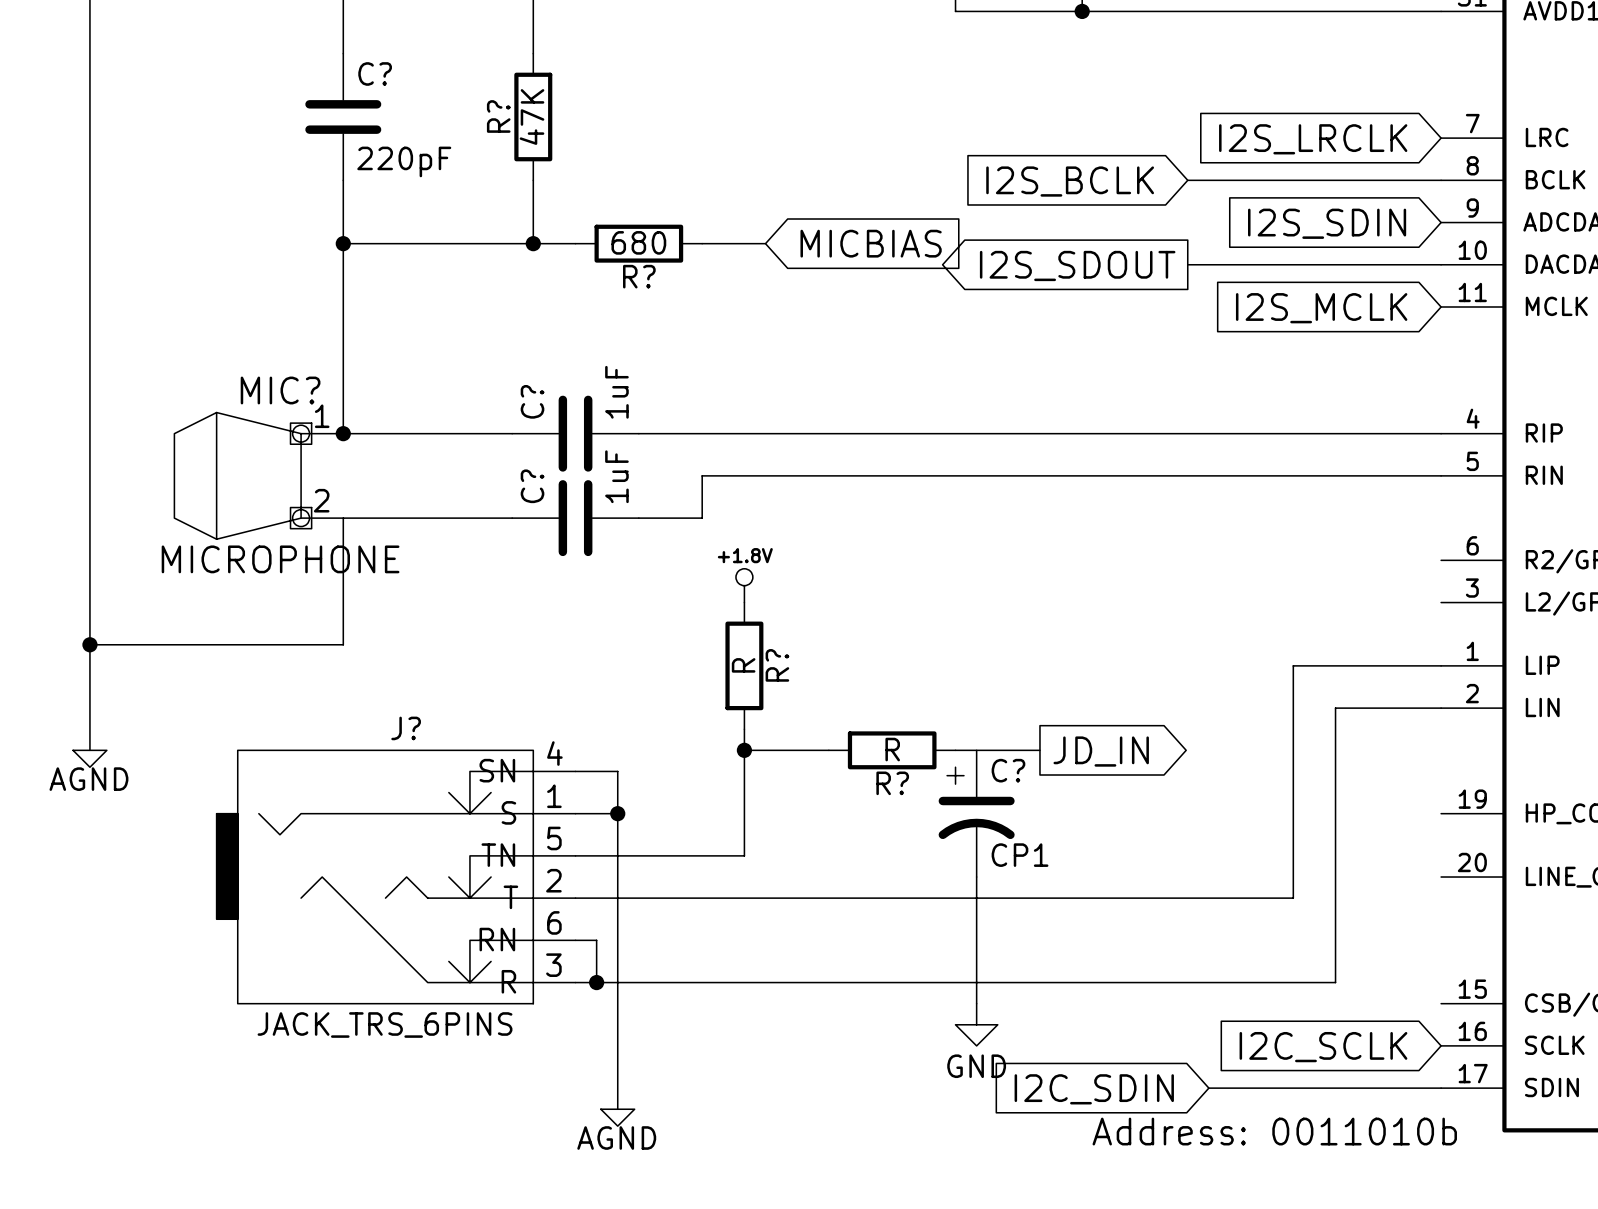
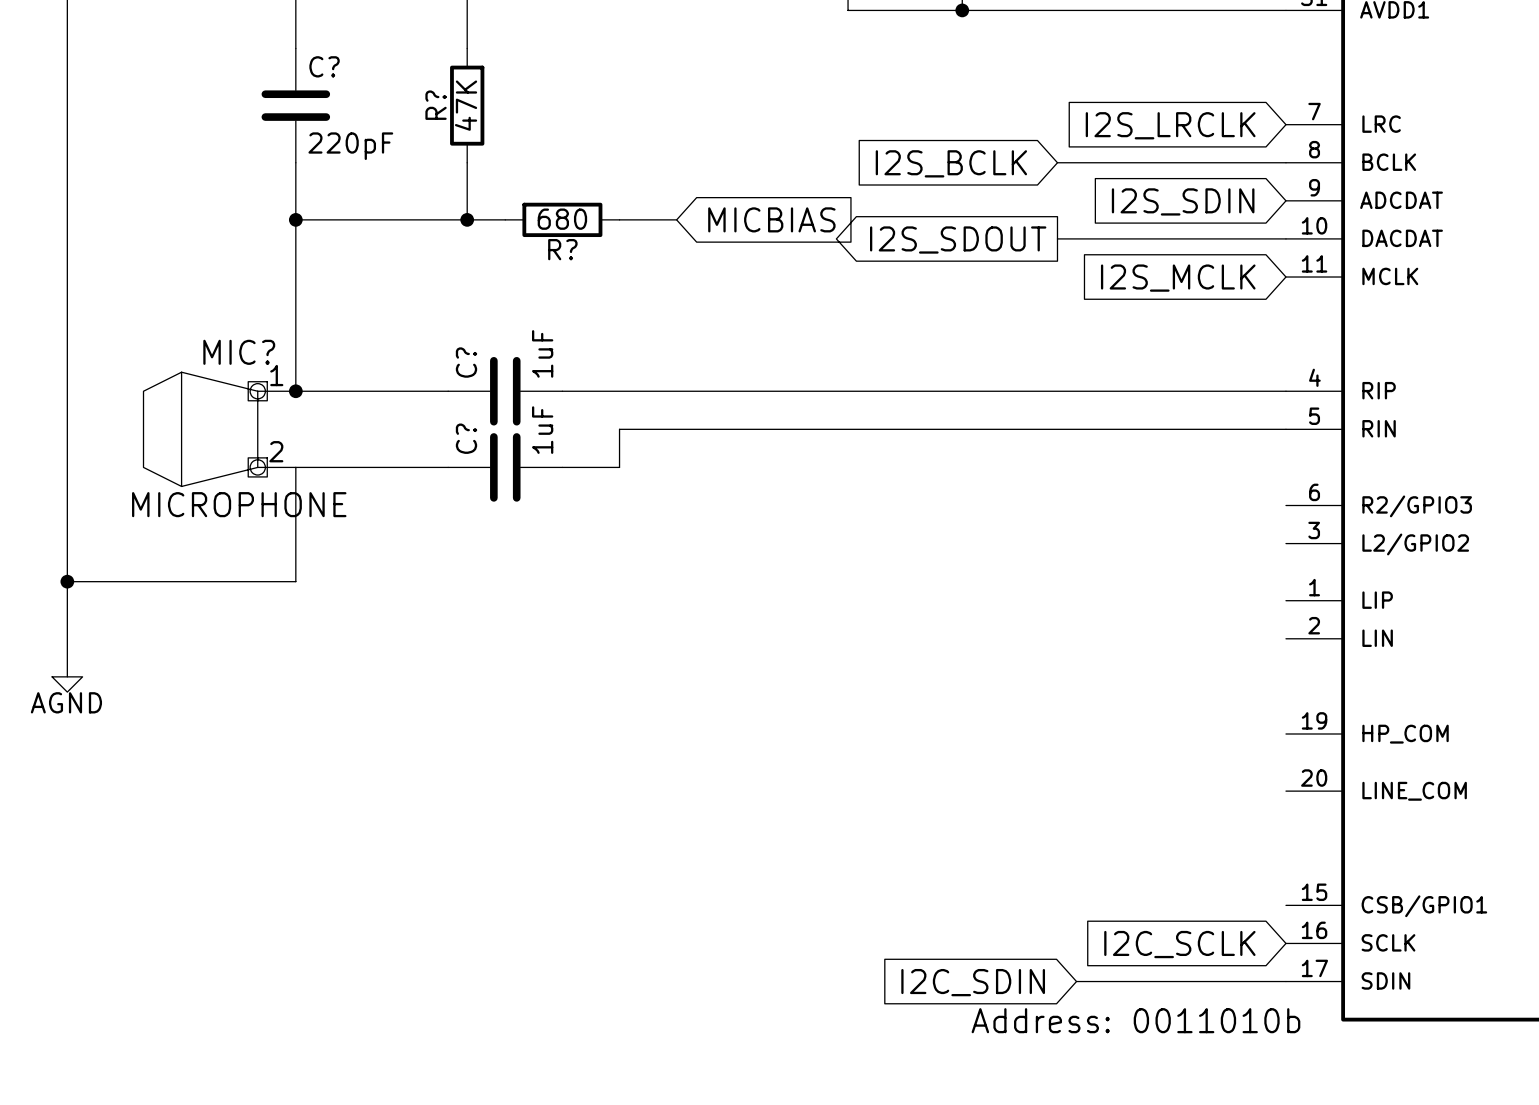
power symbol: +1.8V (744, 585) -> none
R?: R (744, 665) -> none
wire: (1441, 665) (1293, 665) (1293, 898) (575, 898) -> none
wire: (1441, 708) (1335, 708) (1335, 982) (575, 982) -> none
wire: (744, 729) (744, 855) (575, 855) -> none
wire: (744, 750) (828, 750) -> none
junction: (744, 750) -> none
R?: R (892, 750) -> none
wire: (955, 750) (1039, 750) -> none
global label: JD_IN (1101, 751) -> none
wire: (575, 771) (617, 771) (617, 1109) -> none
wire: (575, 813) (617, 813) -> none
junction: (617, 813) -> none
C?: CP1 (976, 813) -> none
J?: JACK_TRS_6PINS (396, 877) -> none
wire: (976, 877) (976, 1003) -> none
wire: (575, 940) (596, 940) (596, 982) -> none
junction: (596, 982) -> none
power symbol: GND (976, 1024) -> none
power symbol: AGND (617, 1117) -> none

